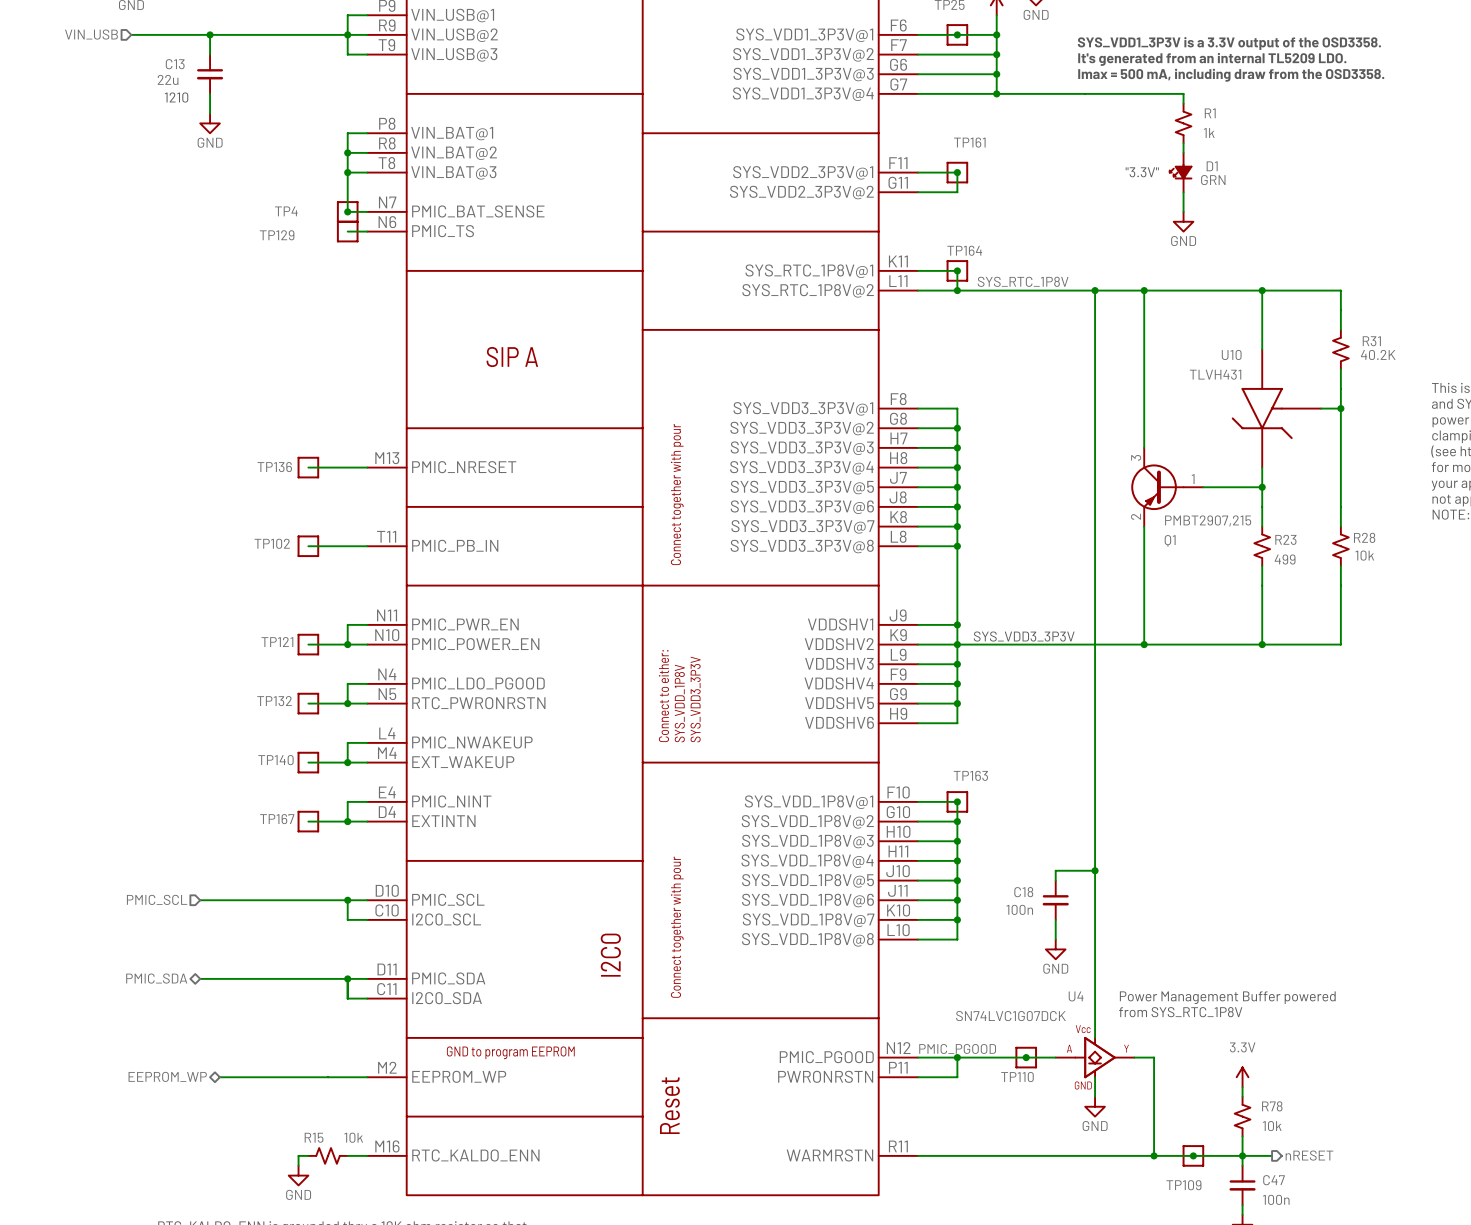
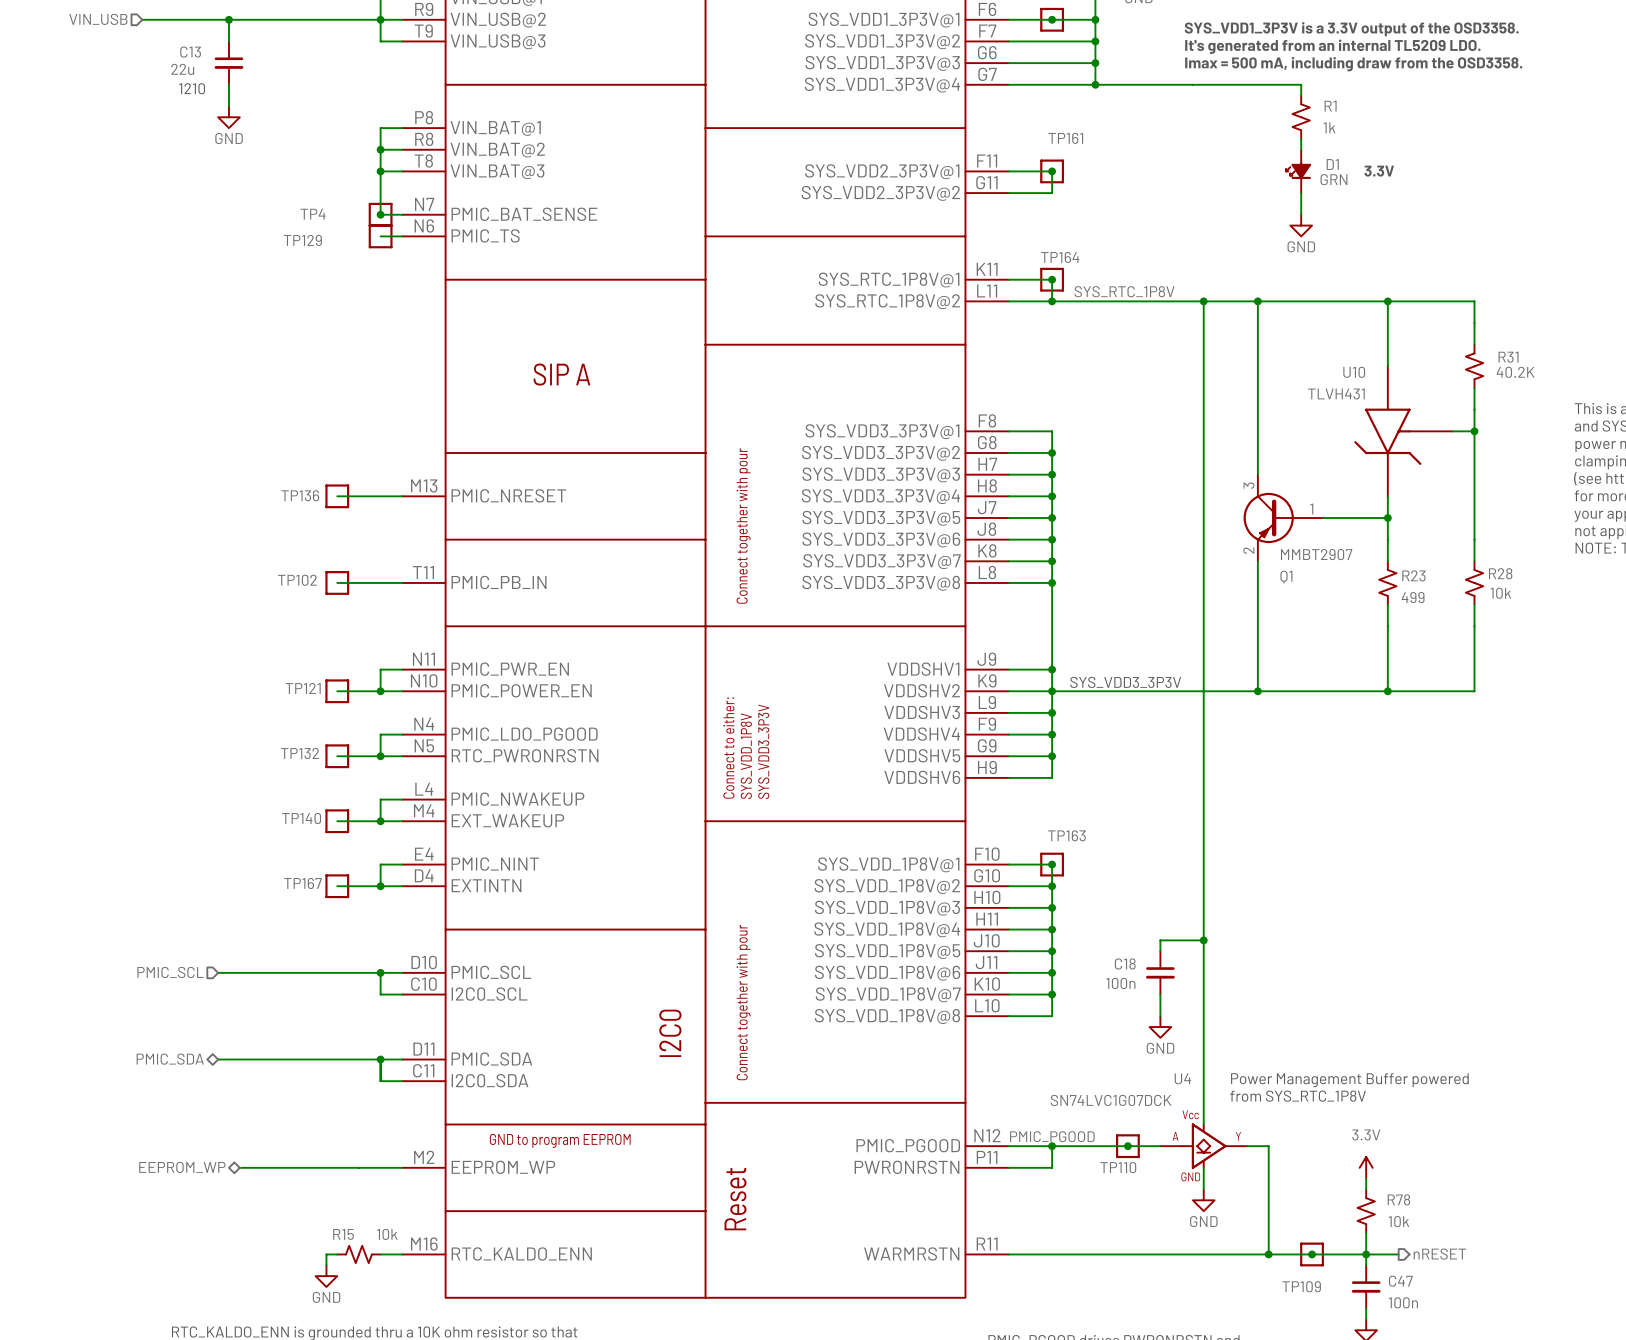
text: "3.3V" (1142, 172) -> none
text: none -> 3.3V (1379, 171)
Q1 value: PMBT2907,215 (1208, 520) -> MMBT2907 (1316, 554)

